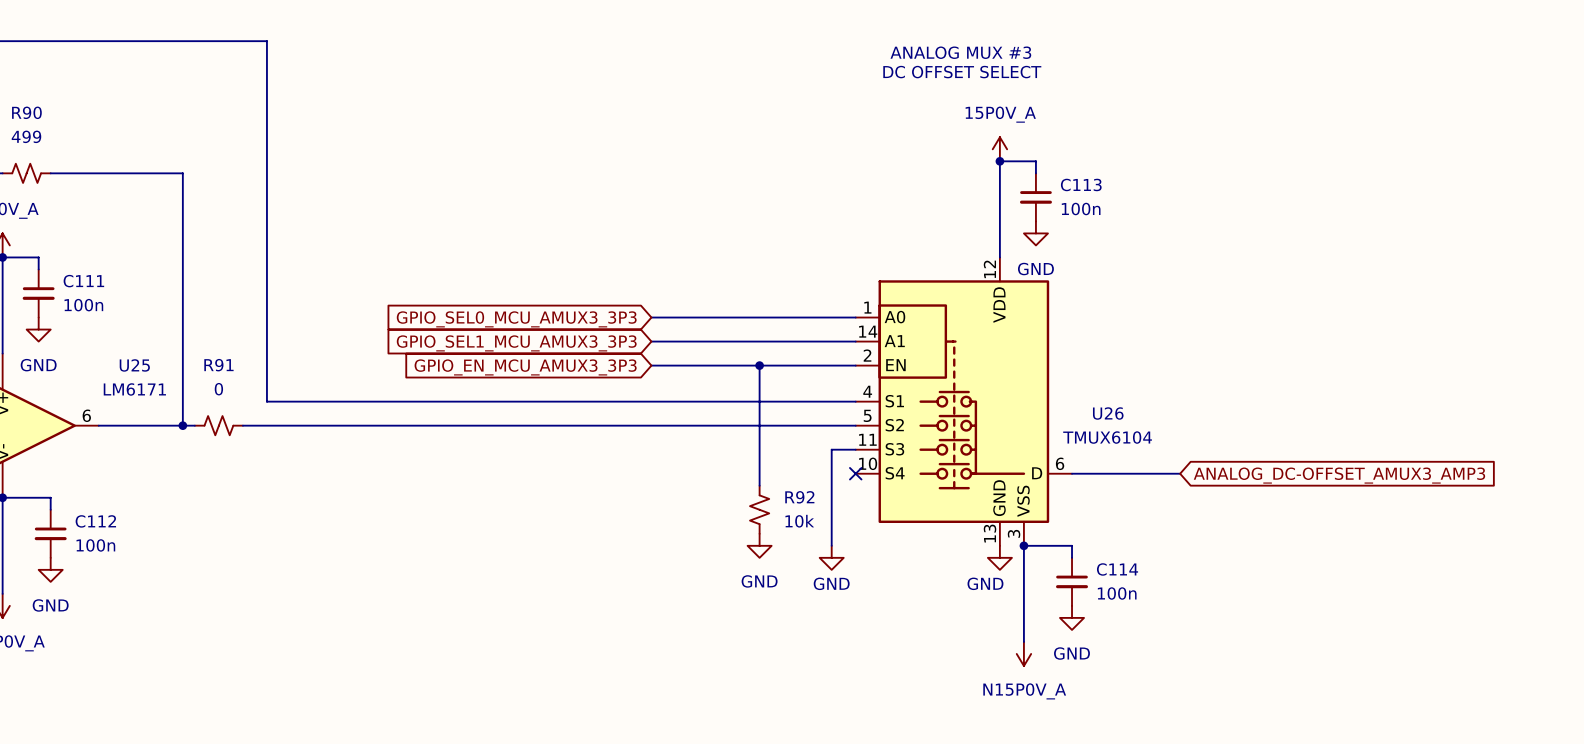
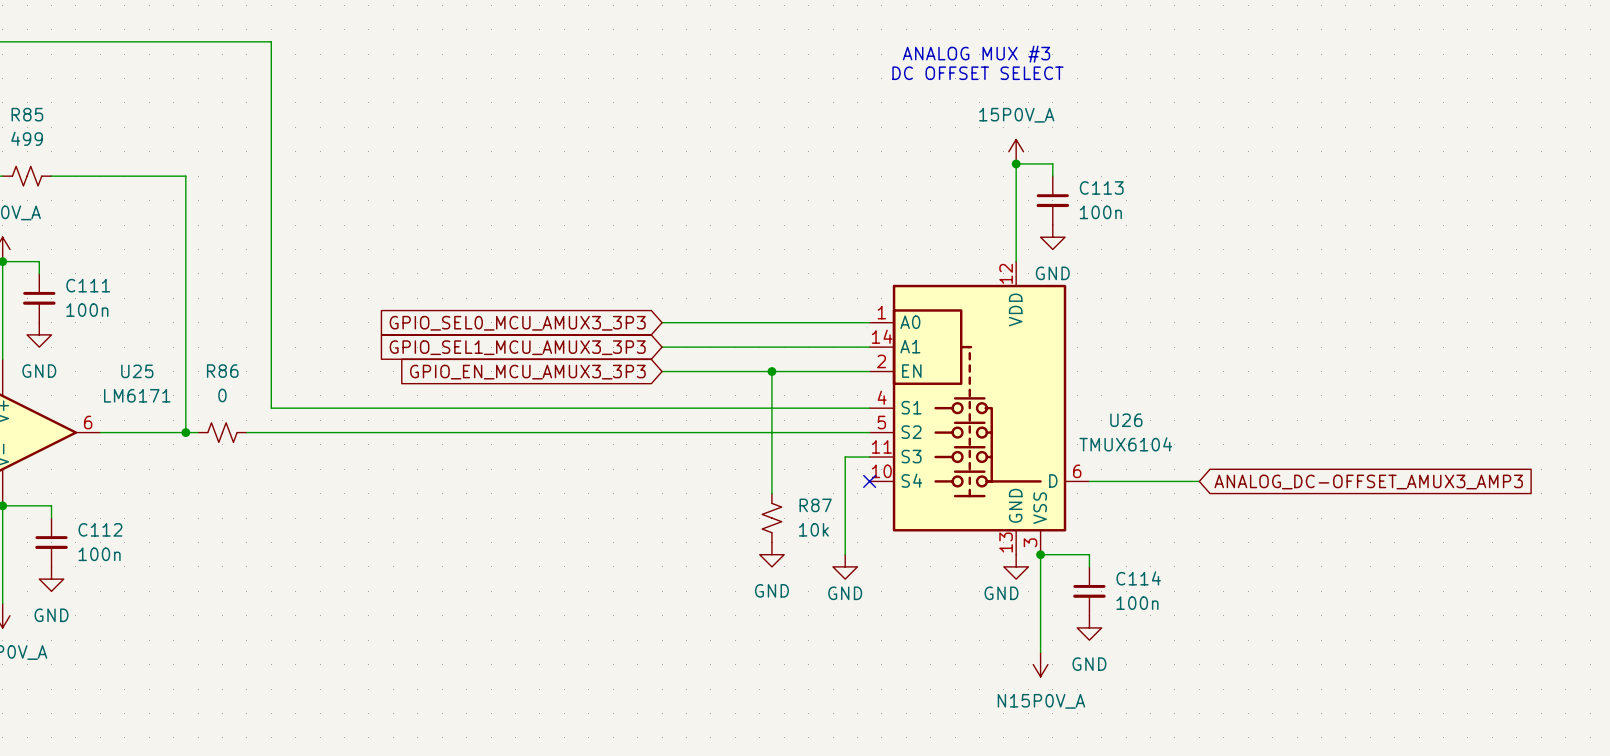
R90 name: R90 (26, 112) -> R85 (27, 114)
R91 name: R91 (218, 365) -> R86 (222, 371)
R92 name: R92 (799, 497) -> R87 (815, 505)

